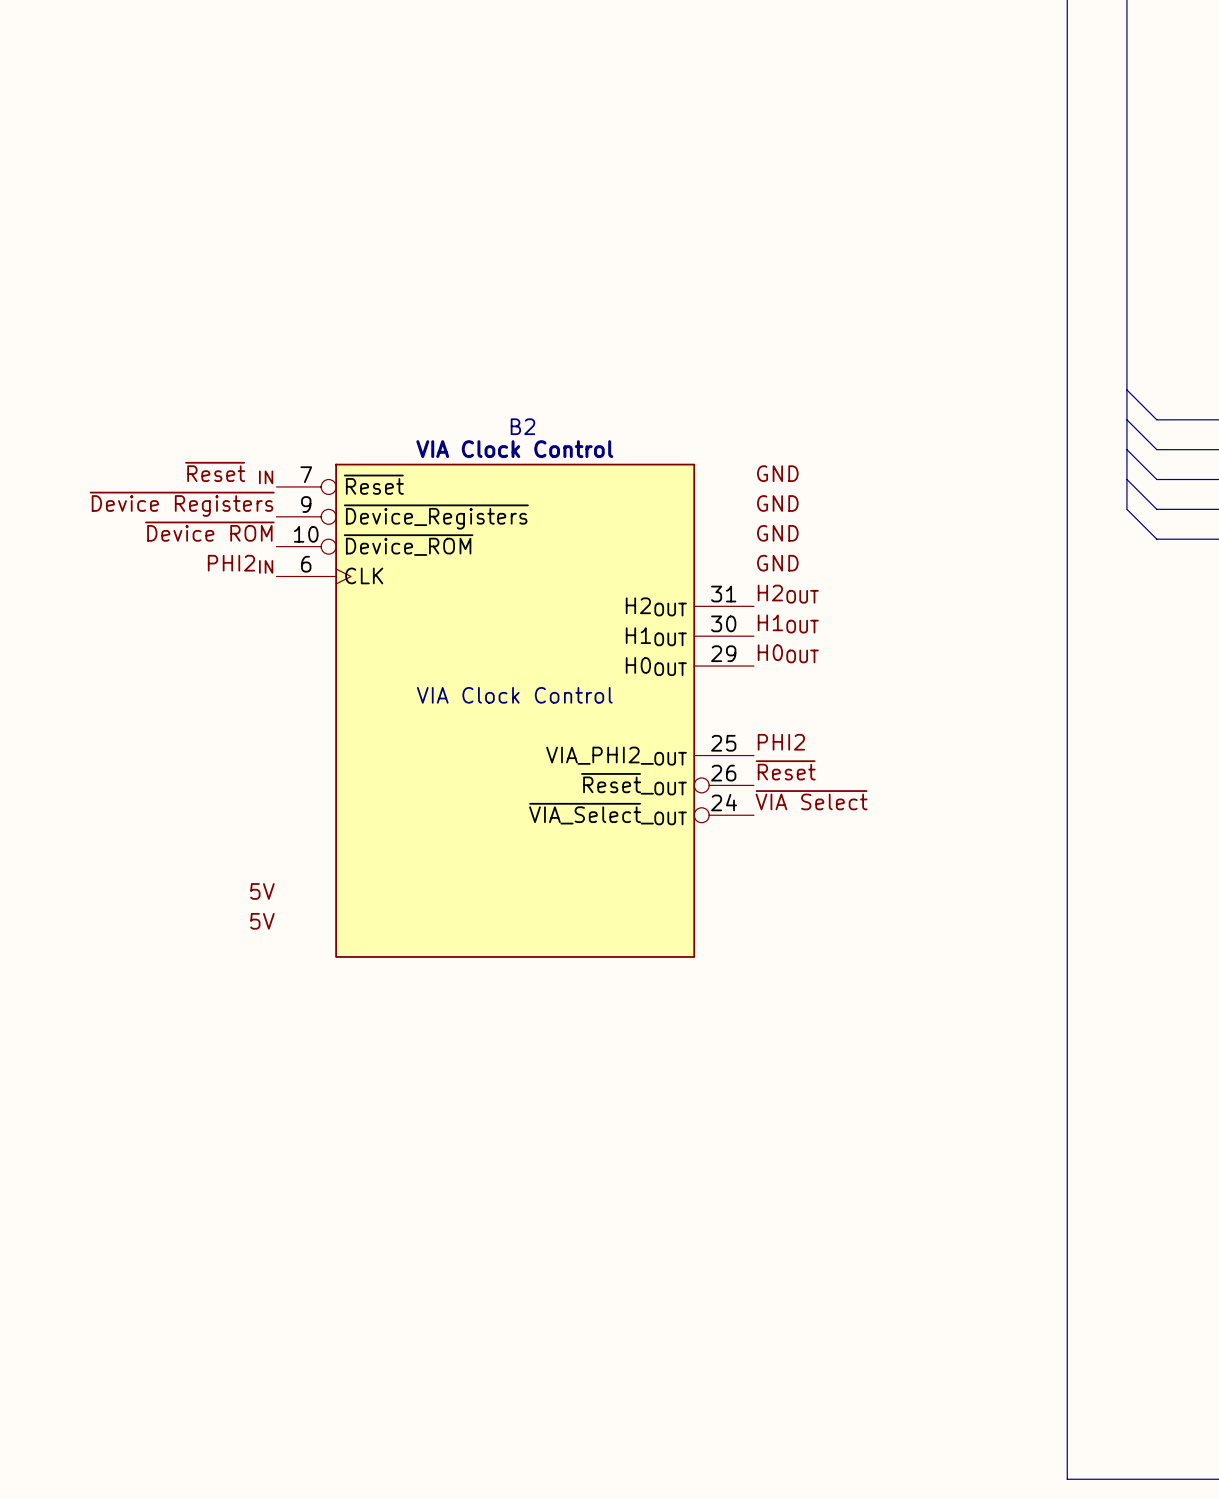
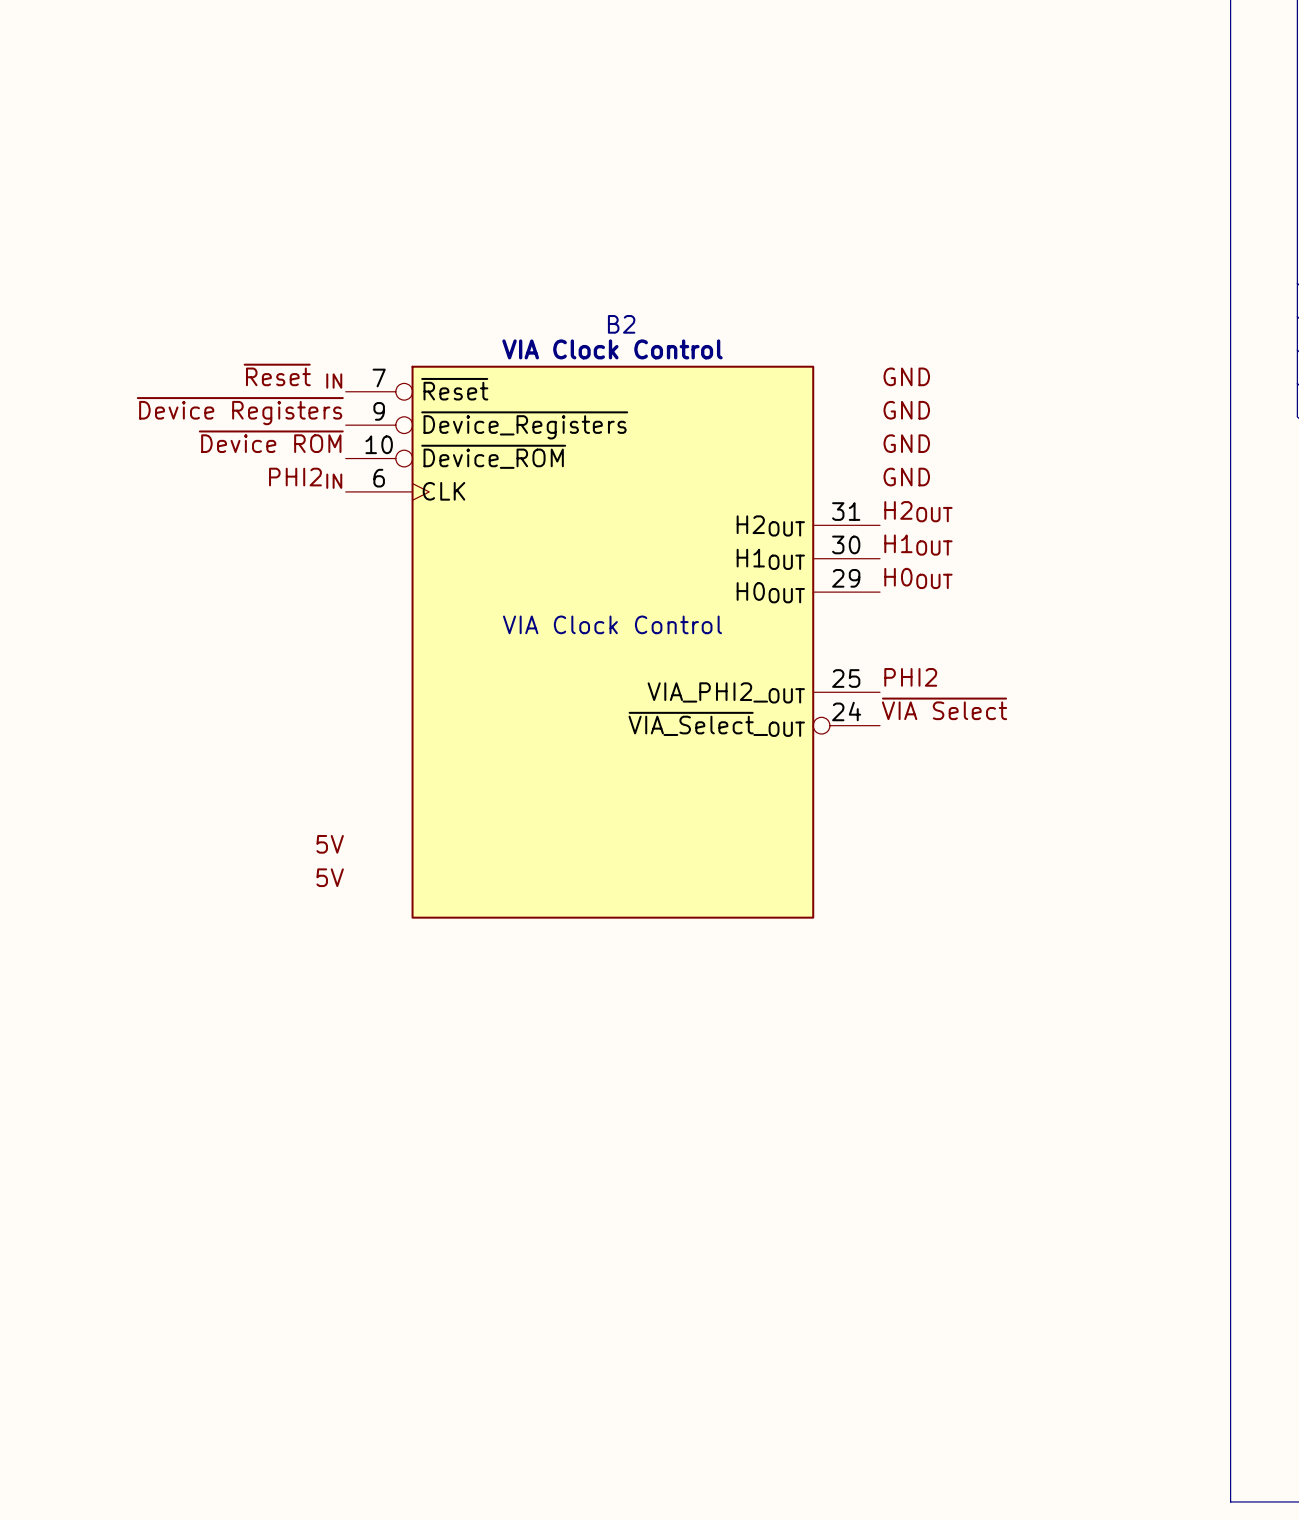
B2 symbol: [276, 463, 754, 958] -> [345, 365, 881, 919]
label: ~{Reset} (785, 770) -> ~{VIA Select} (944, 708)
label: ~{VIA Select} (811, 800) -> none

